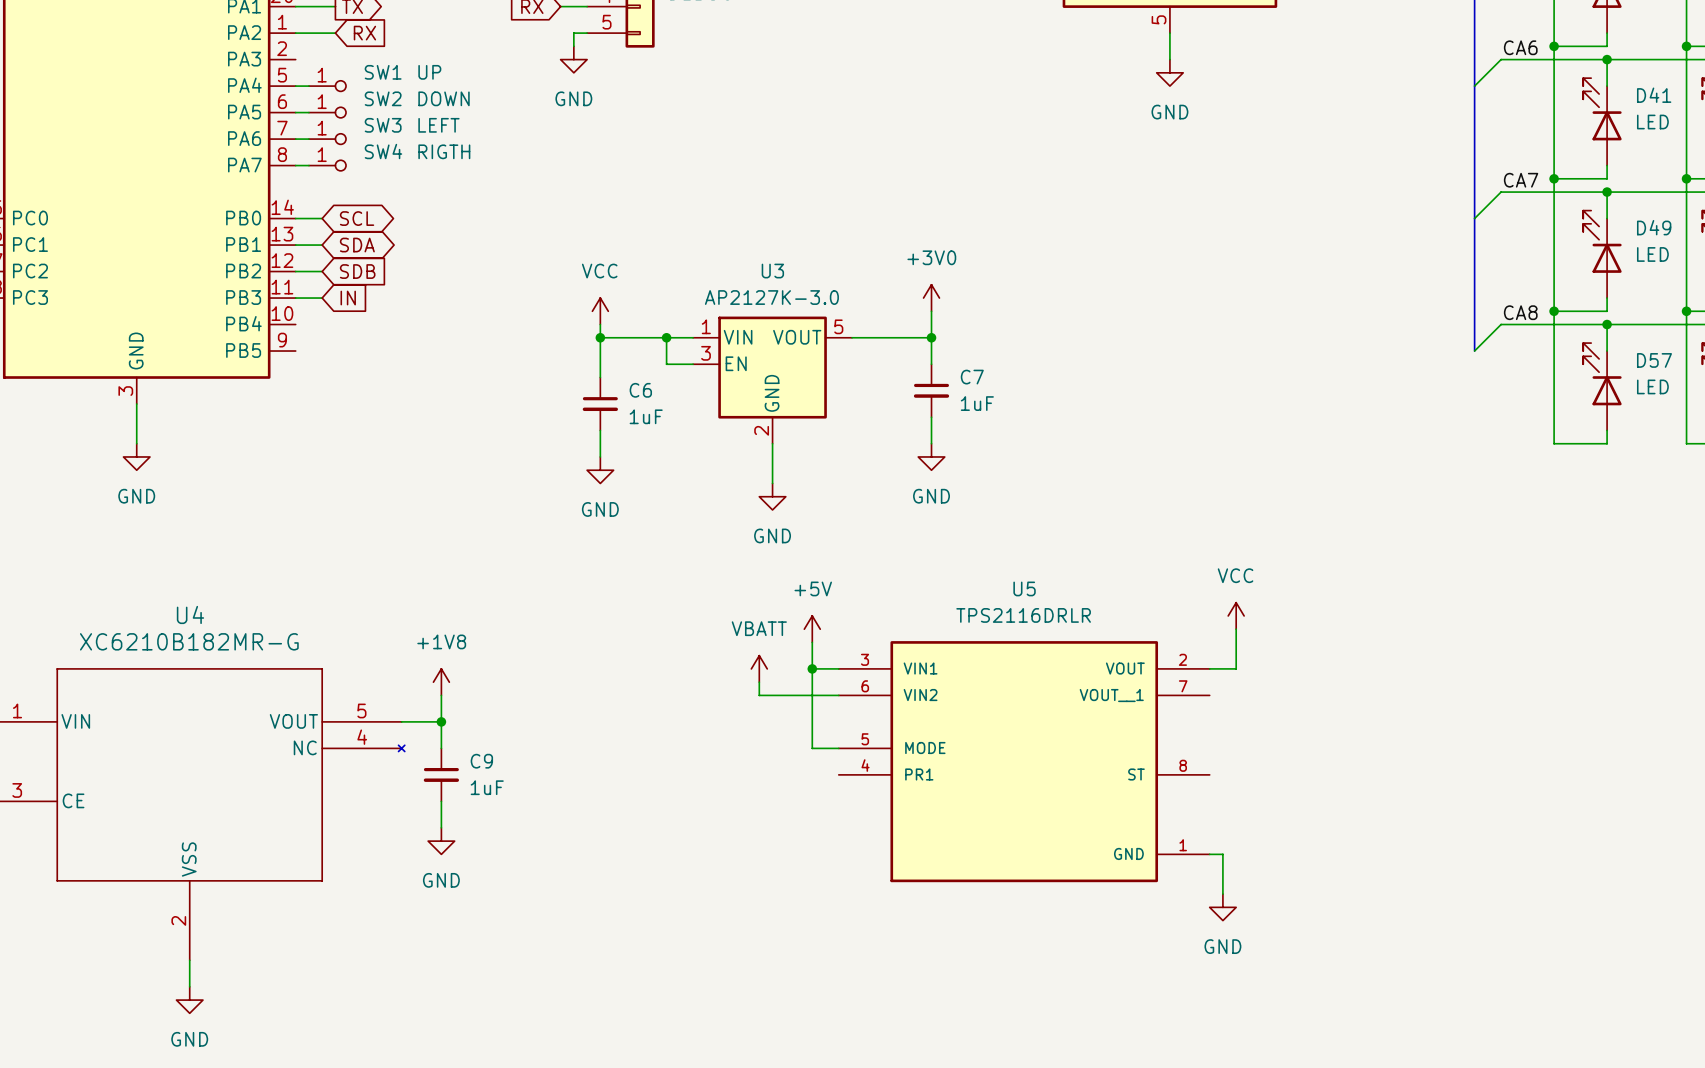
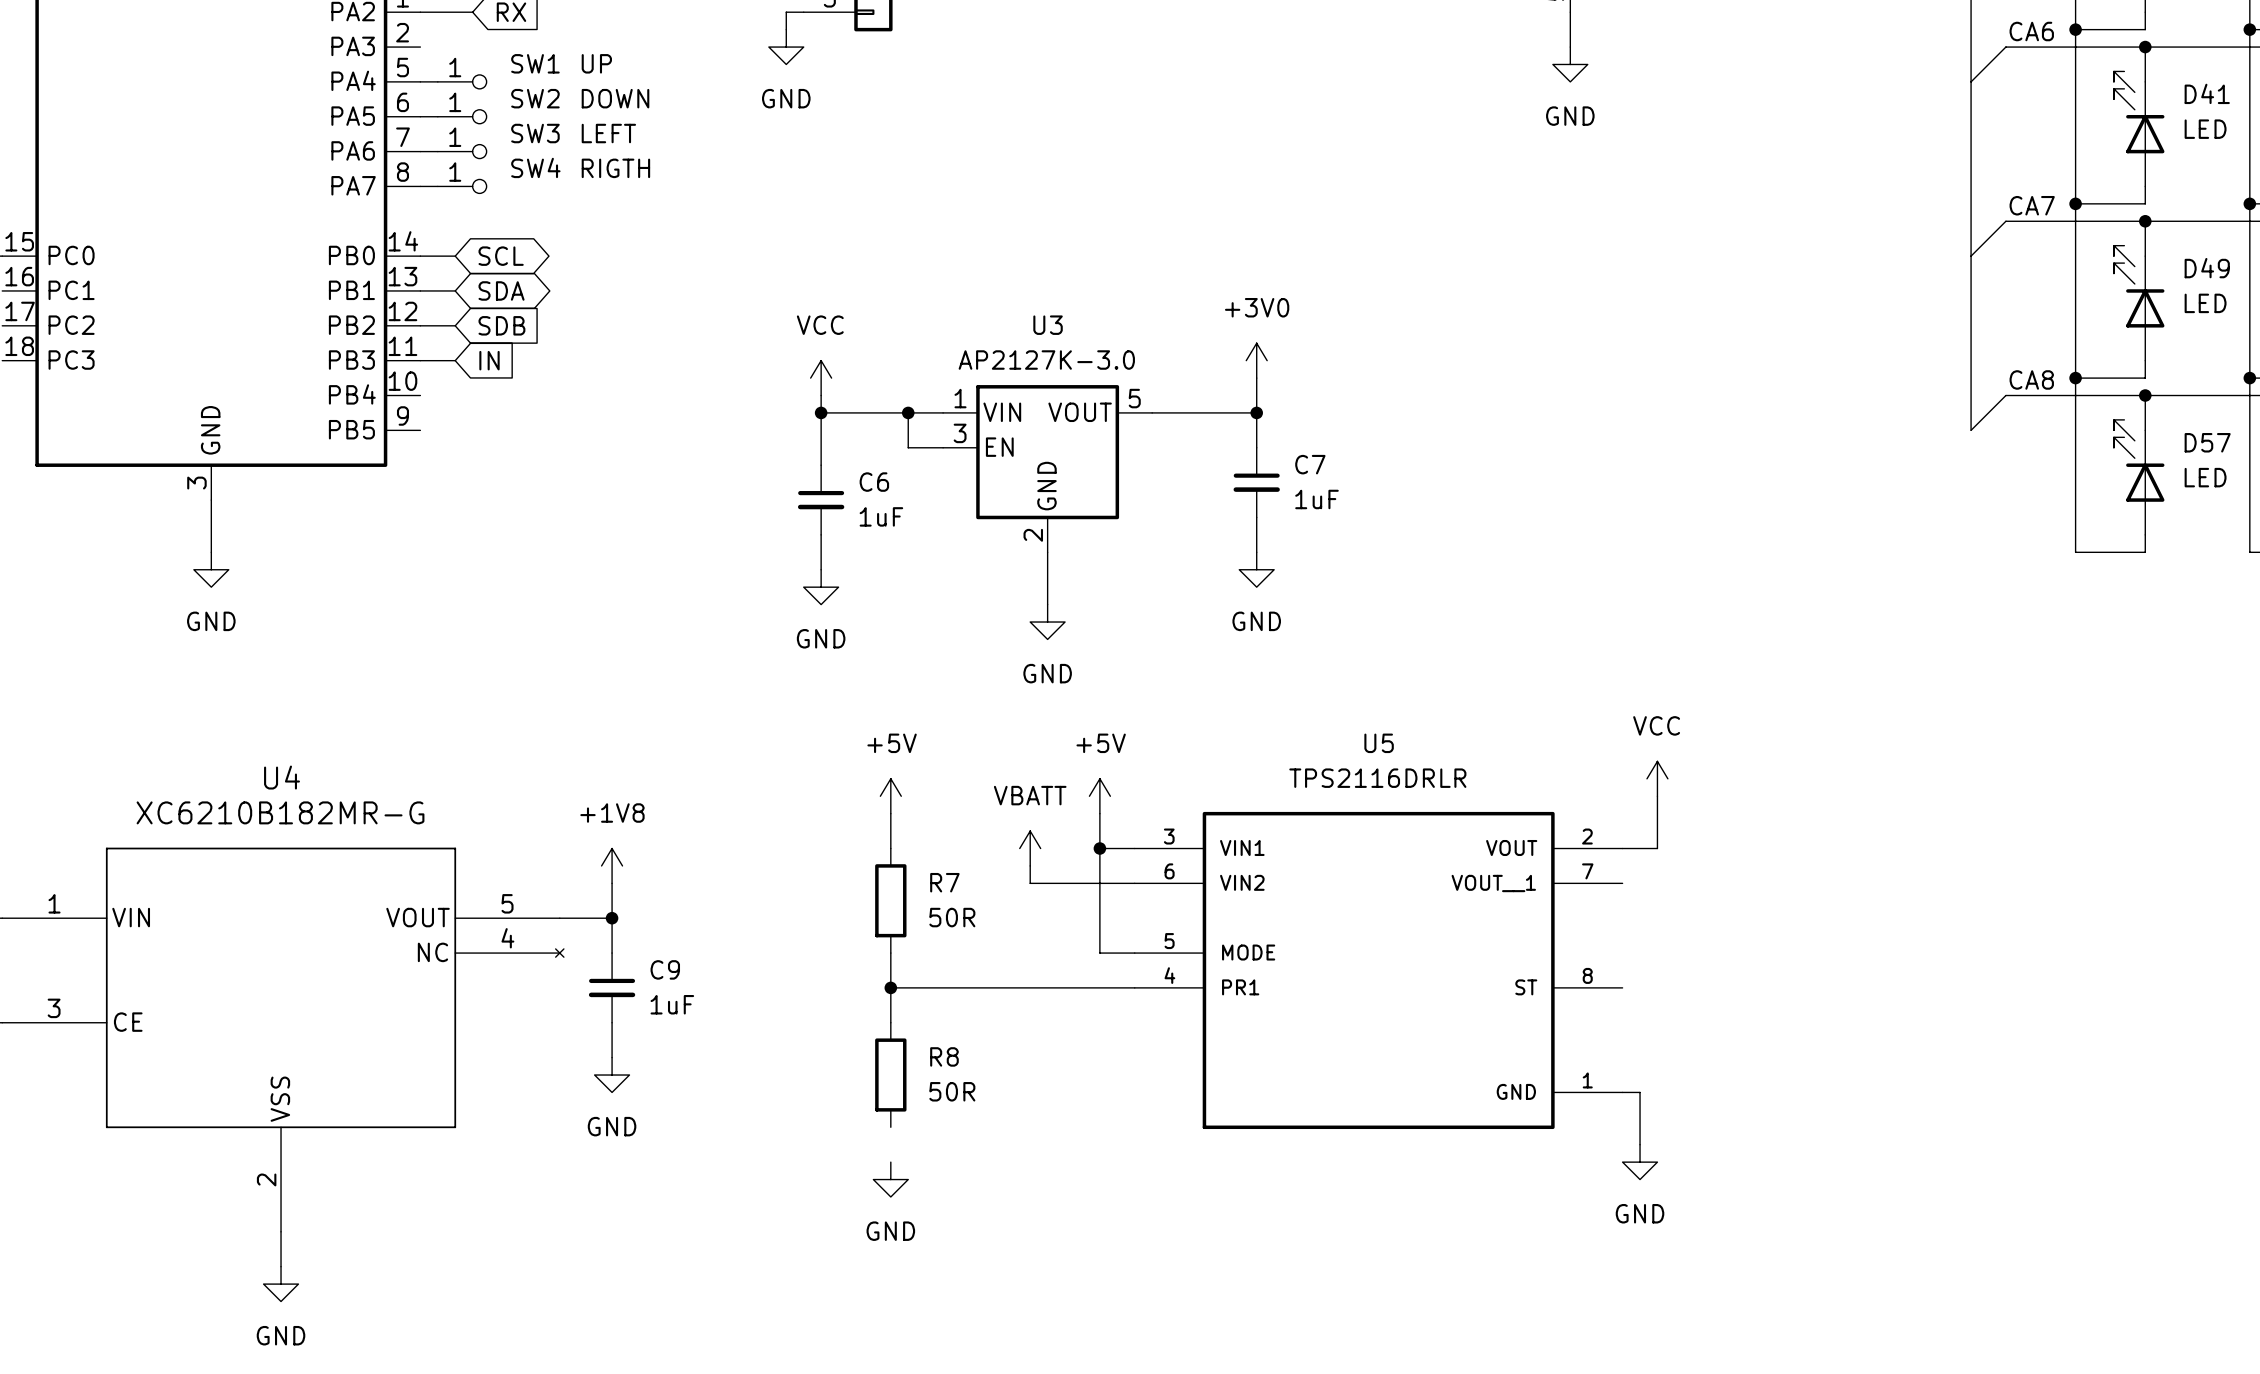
power symbol: none -> +5V (890, 796)
wire: none -> (890, 813) (890, 848)
R7: none -> 50R (890, 900)
wire: none -> (890, 953) (890, 1022)
wire: none -> (890, 987) (1134, 987)
junction: none -> (890, 987)
R8: none -> 50R (890, 1075)
power symbol: none -> GND (890, 1179)

